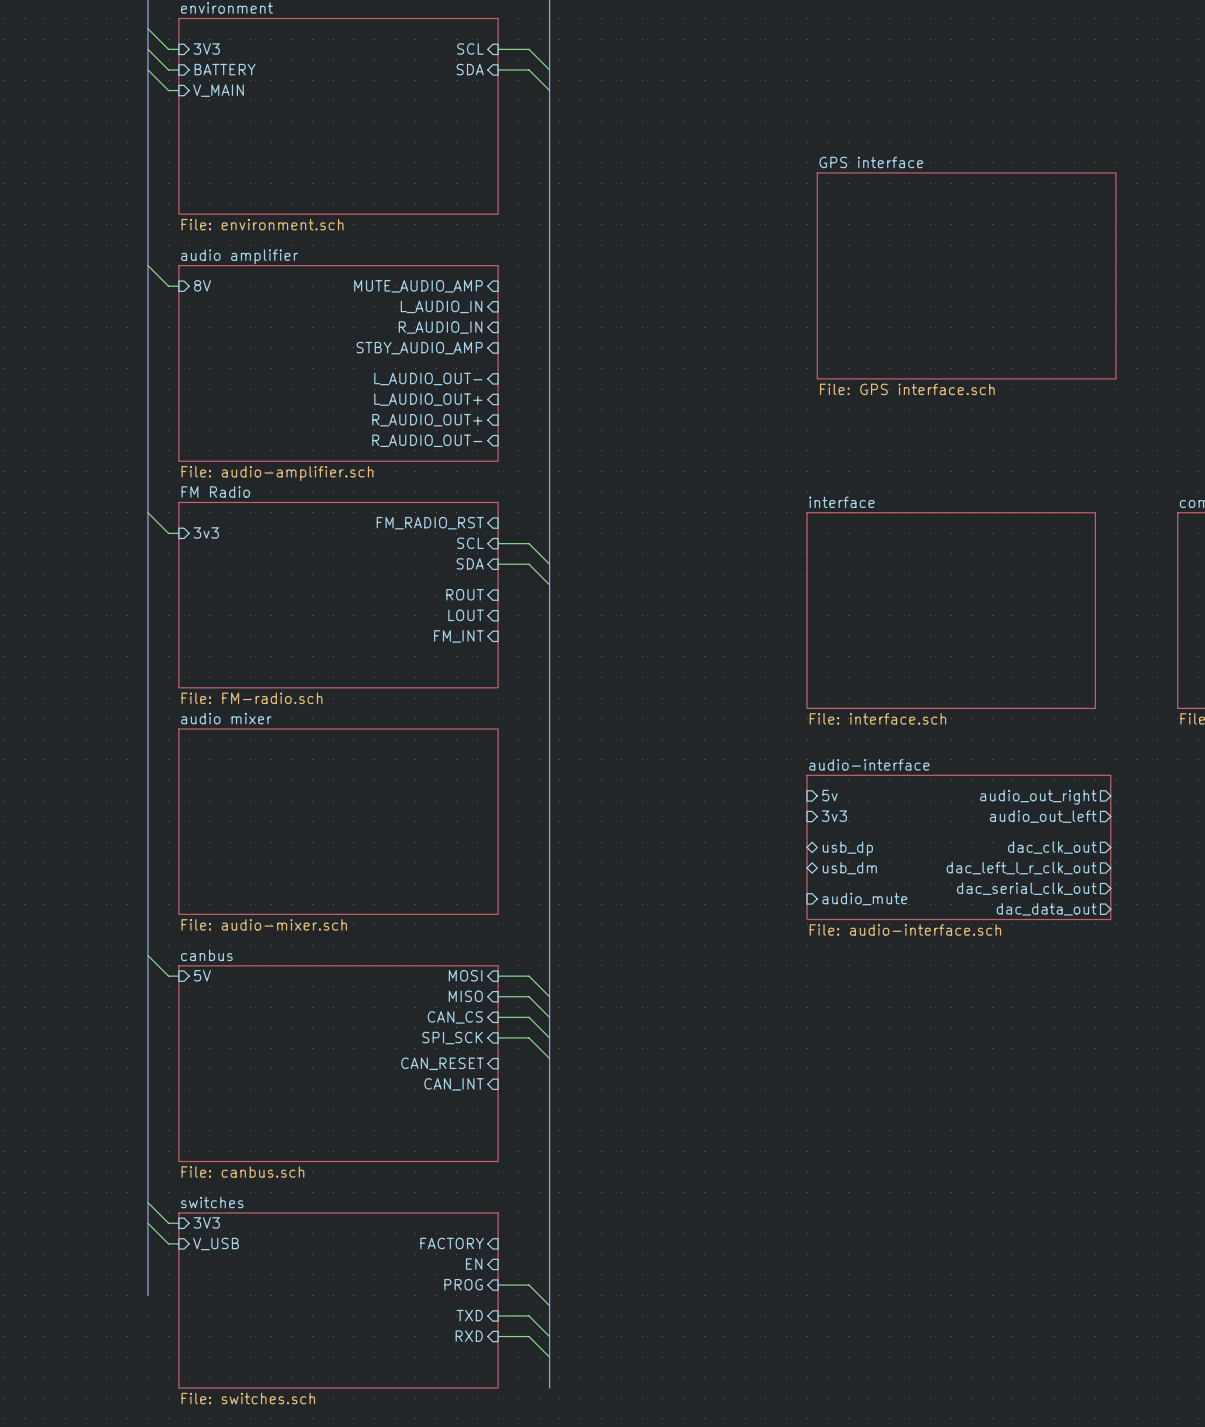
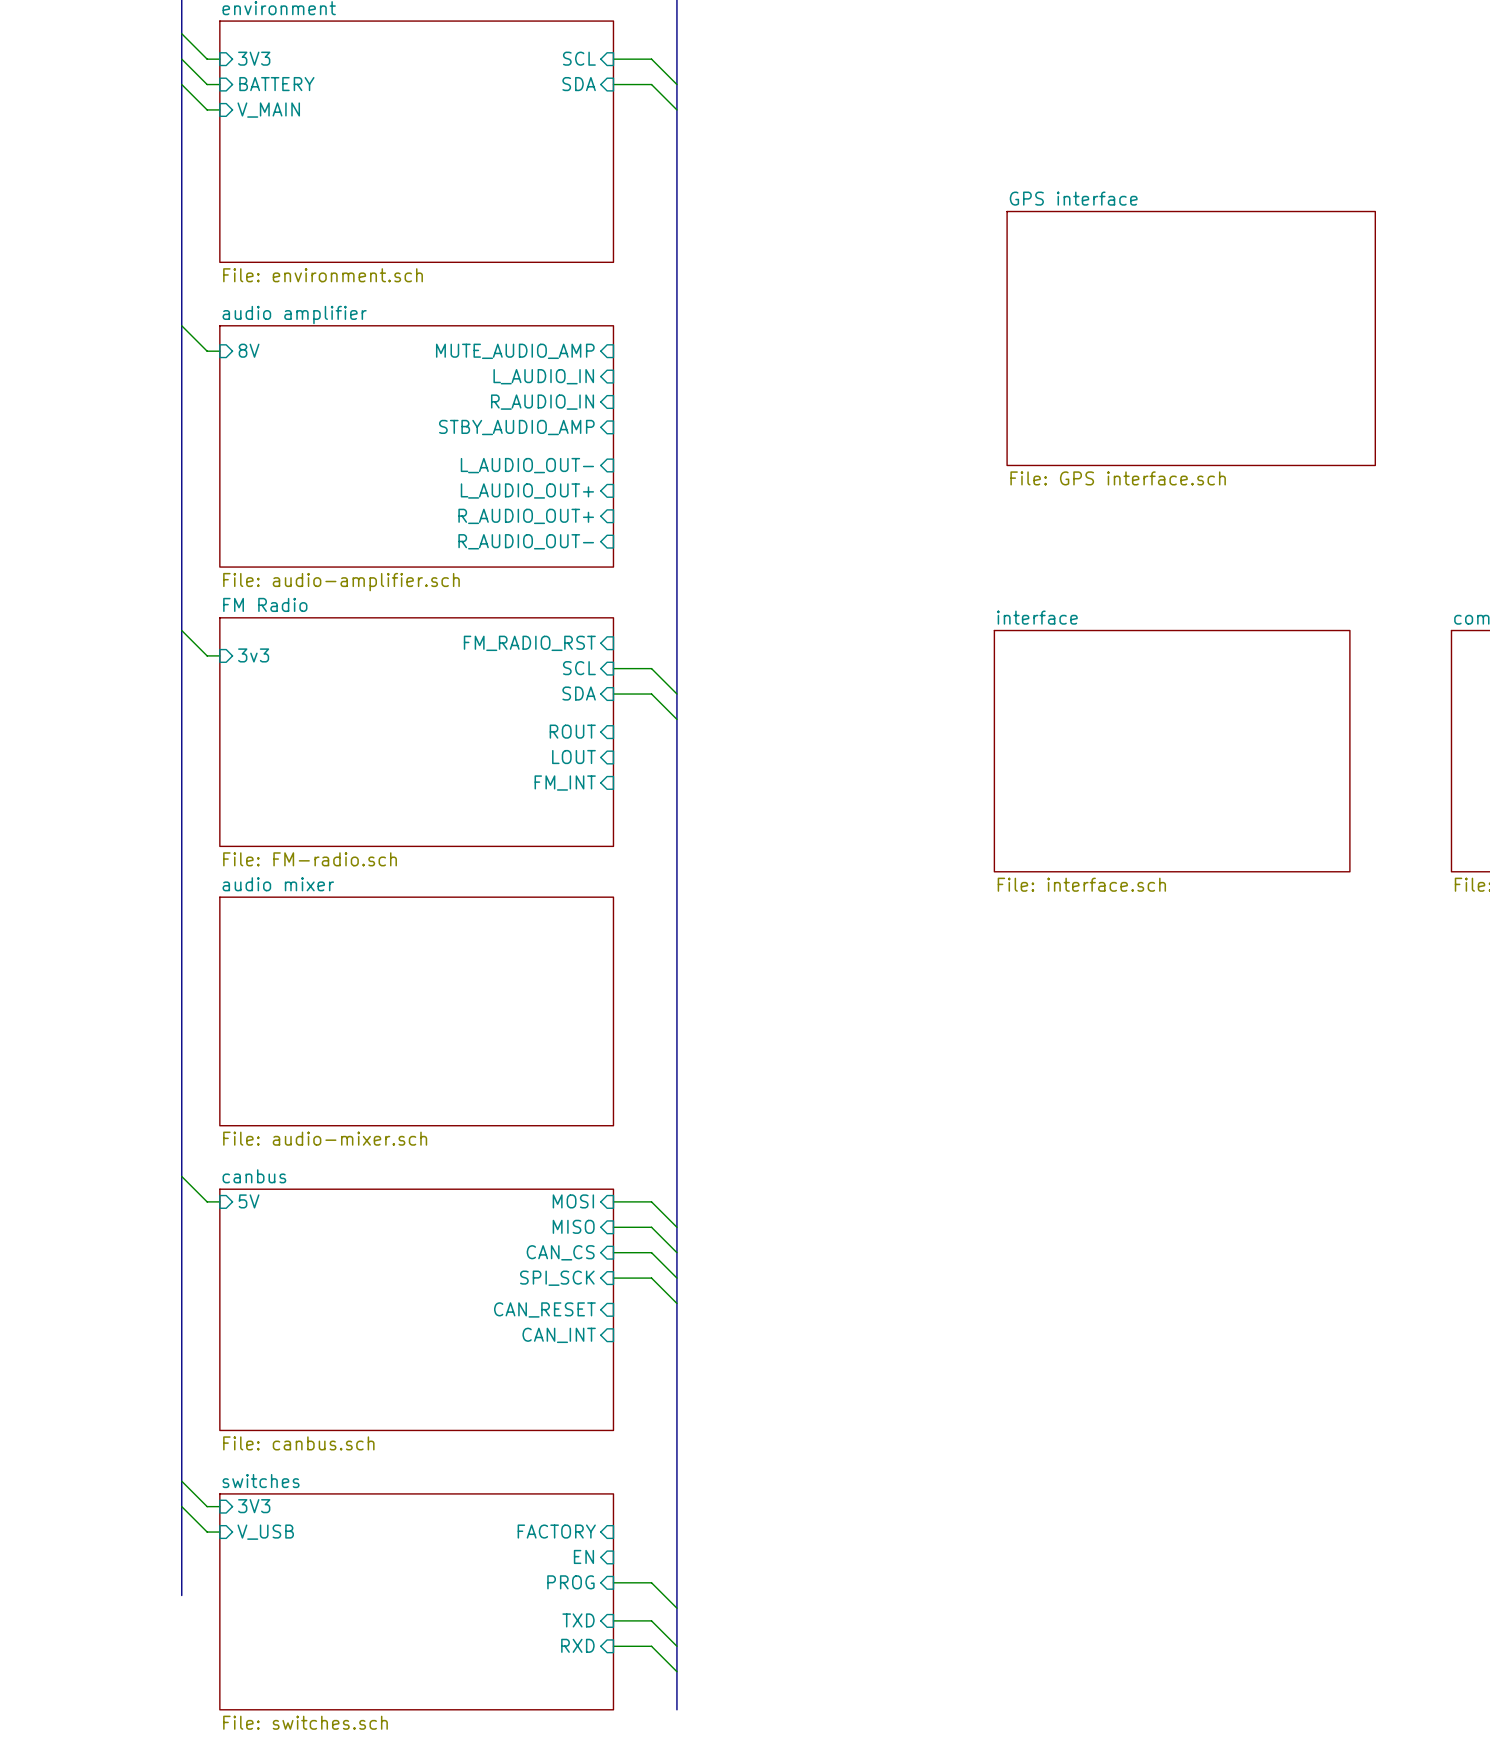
sheet pin: 5v (829, 795) -> none
sheet pin: audio_out_right (1038, 797) -> none
sheet pin: 3v3 (834, 816) -> none
sheet pin: audio_out_left (1043, 816) -> none
sheet audio-interface: File: audio-interface.sch (958, 847) -> none
sheet pin: dac_clk_out (1052, 847) -> none
sheet pin: usb_dp (847, 848) -> none
sheet pin: usb_dm (849, 868) -> none
sheet pin: dac_left_l_r_clk_out (1021, 868) -> none
sheet pin: dac_serial_clk_out (1026, 888) -> none
sheet pin: audio_mute (864, 899) -> none
sheet pin: dac_data_out (1046, 909) -> none

